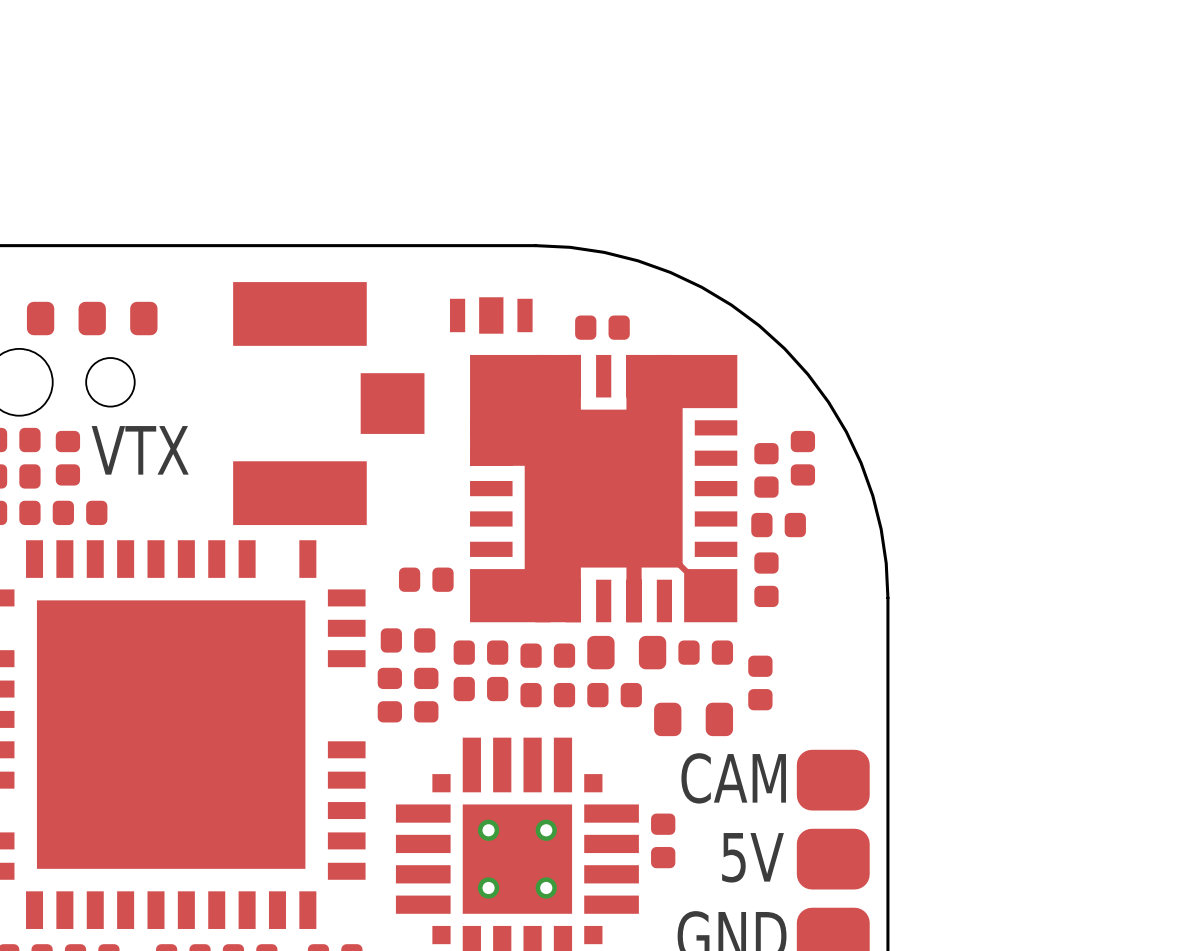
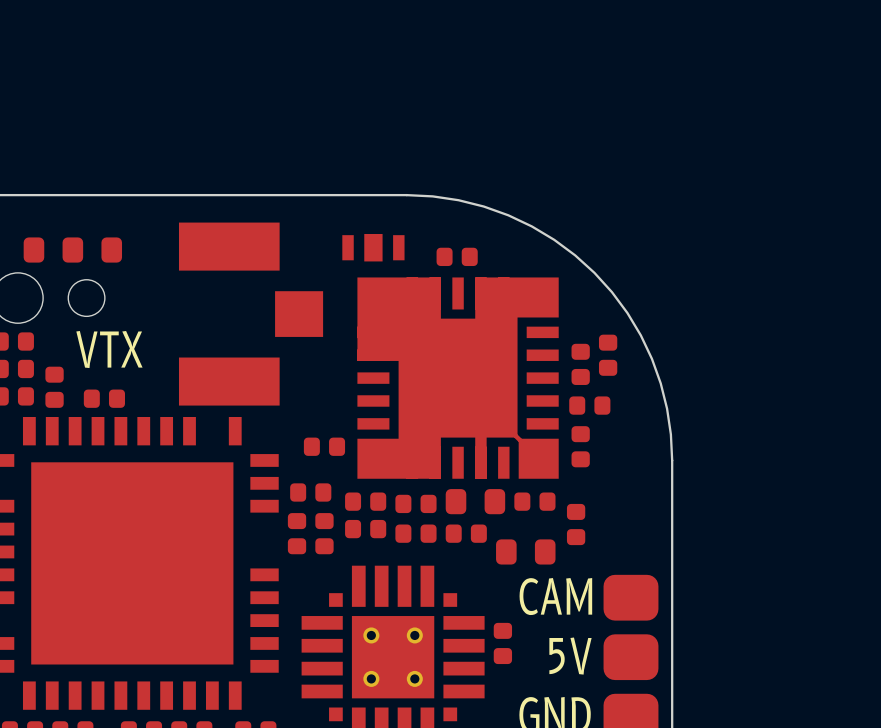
part rotation: 0° (67, 458) -> 90° clockwise (104, 398)
part position: (67, 458) -> (104, 398)
part rotation: 0° (80, 512) -> 90° clockwise (54, 387)

